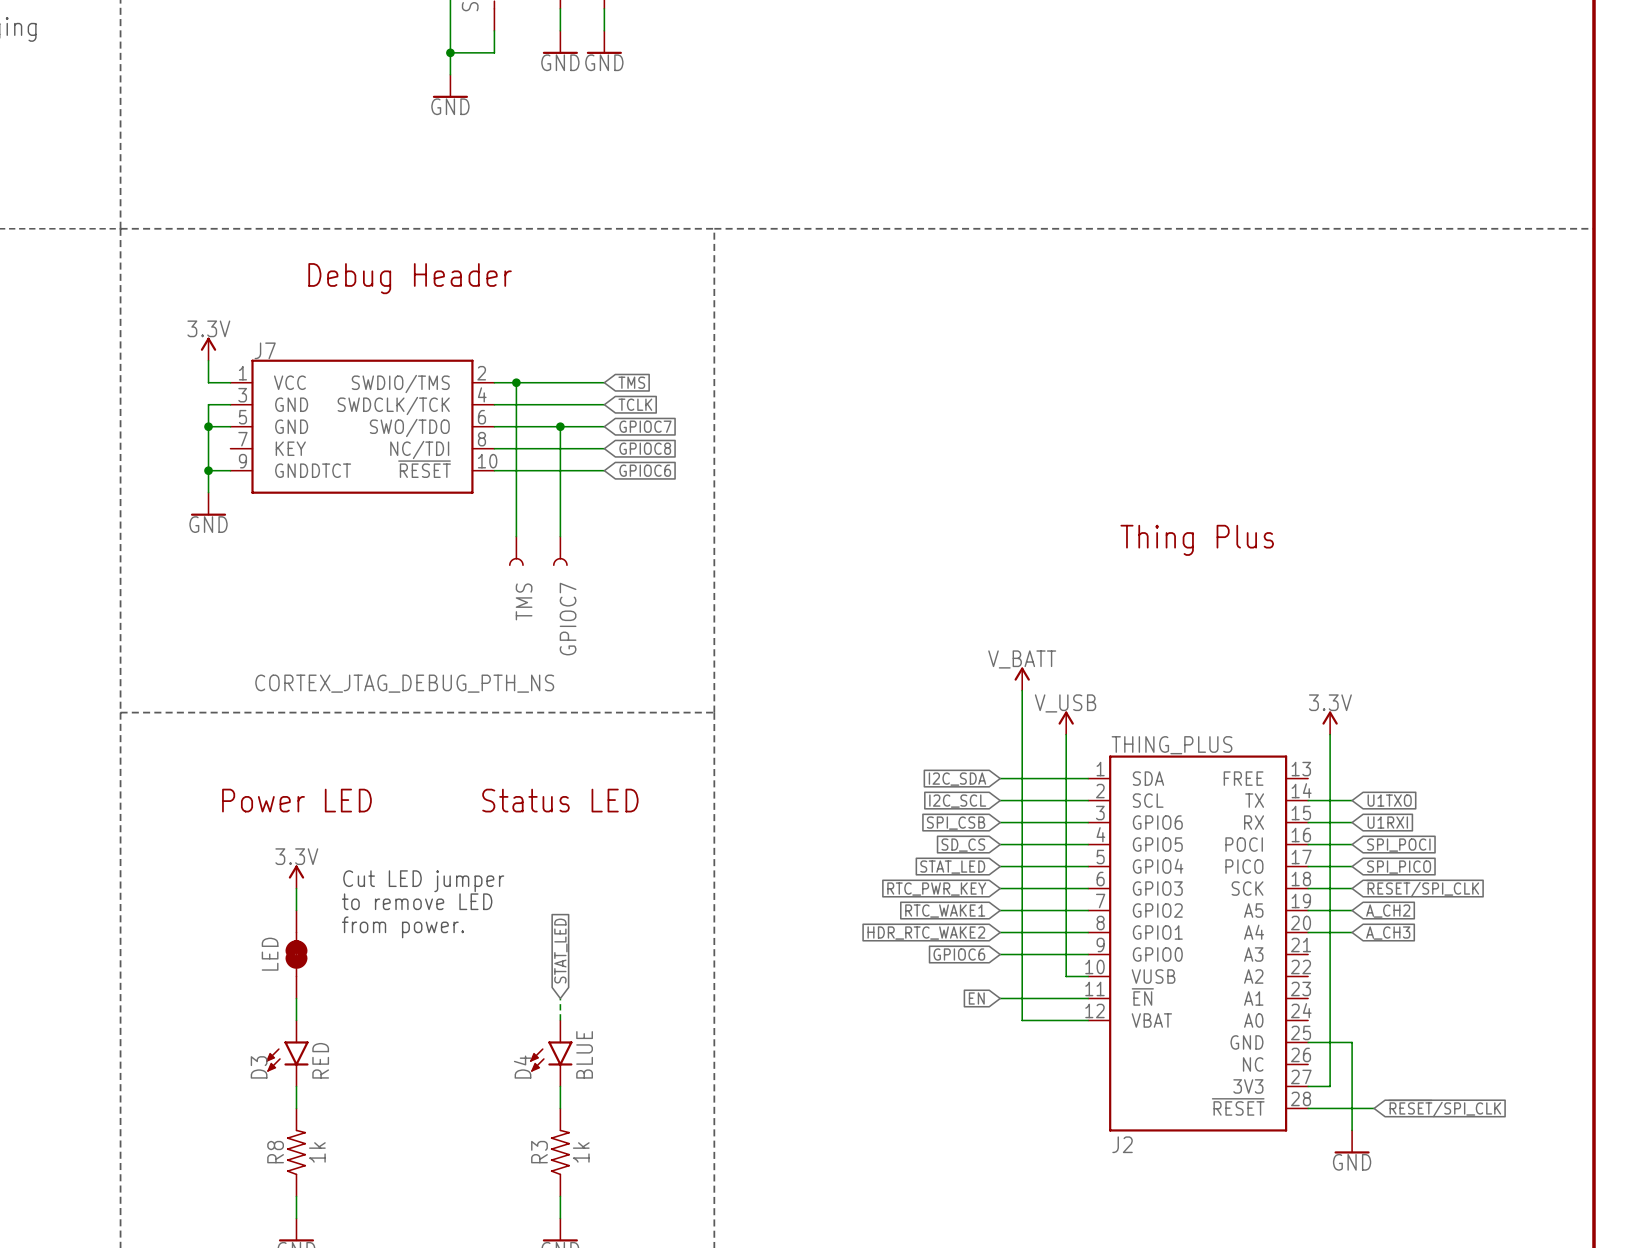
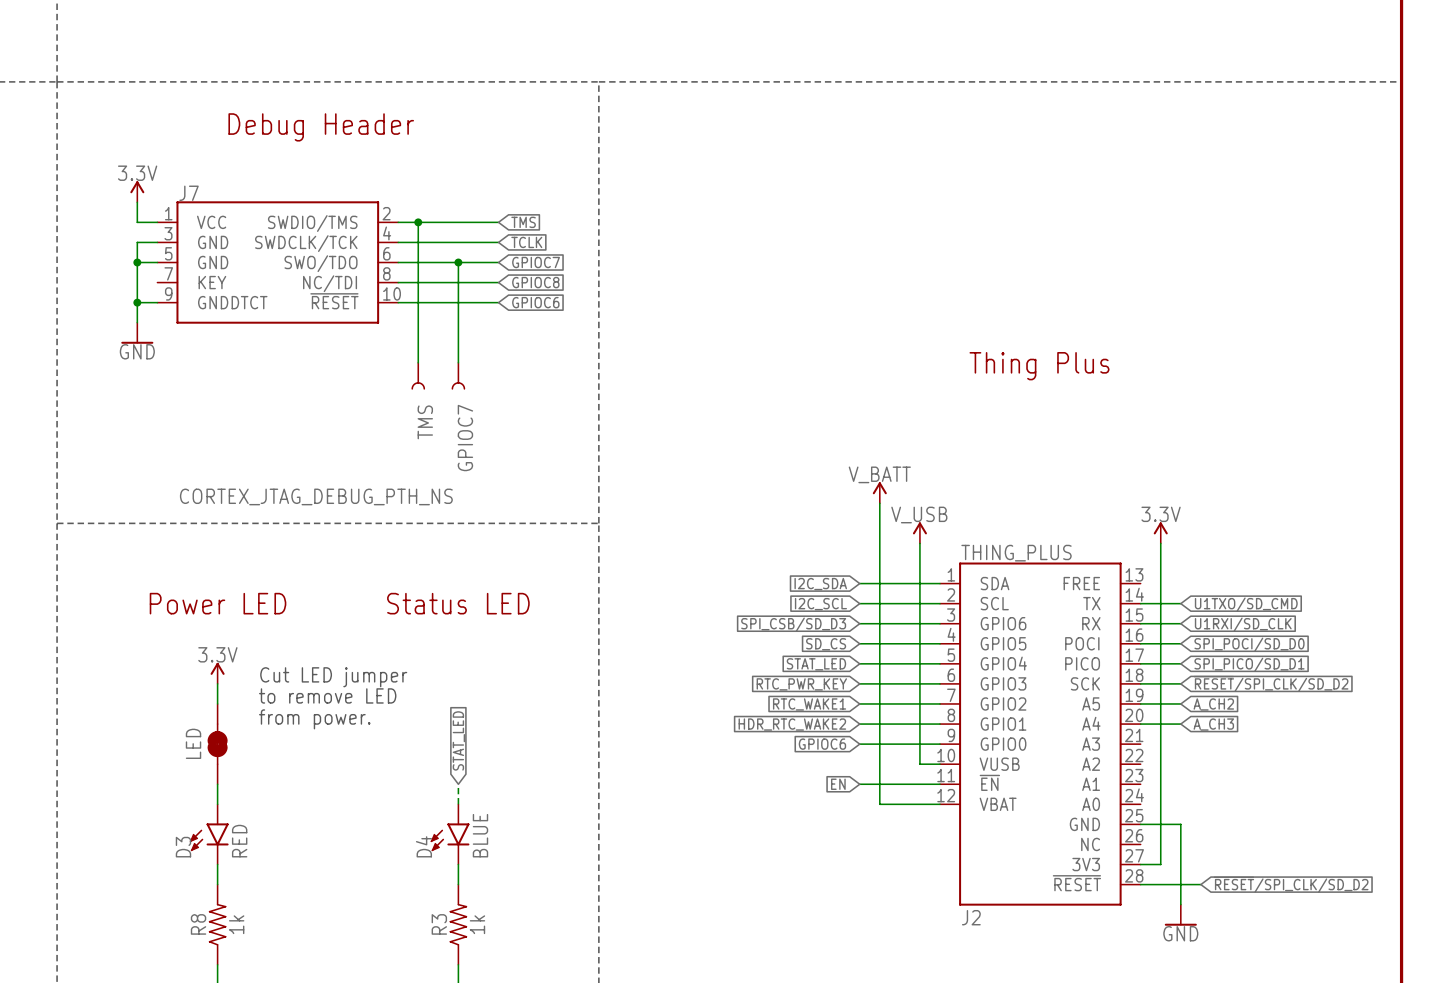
global label: U1TXO (1389, 800) -> U1TXO/SD_CMD (1246, 604)
global label: U1RXI (1387, 822) -> U1RXI/SD_CLK (1243, 624)
global label: SPI_CSB (956, 823) -> SPI_CSB/SD_D3 (793, 624)
global label: SPI_POCI (1398, 845) -> SPI_POCI/SD_D0 (1249, 644)
global label: SPI_PICO (1399, 867) -> SPI_PICO/SD_D1 (1249, 664)
global label: ~{RESET}/SPI_CLK (1422, 888) -> ~{RESET}/SPI_CLK/SD_D2 (1271, 683)
global label: ~{RESET}/SPI_CLK (1444, 1108) -> ~{RESET}/SPI_CLK/SD_D2 (1291, 884)

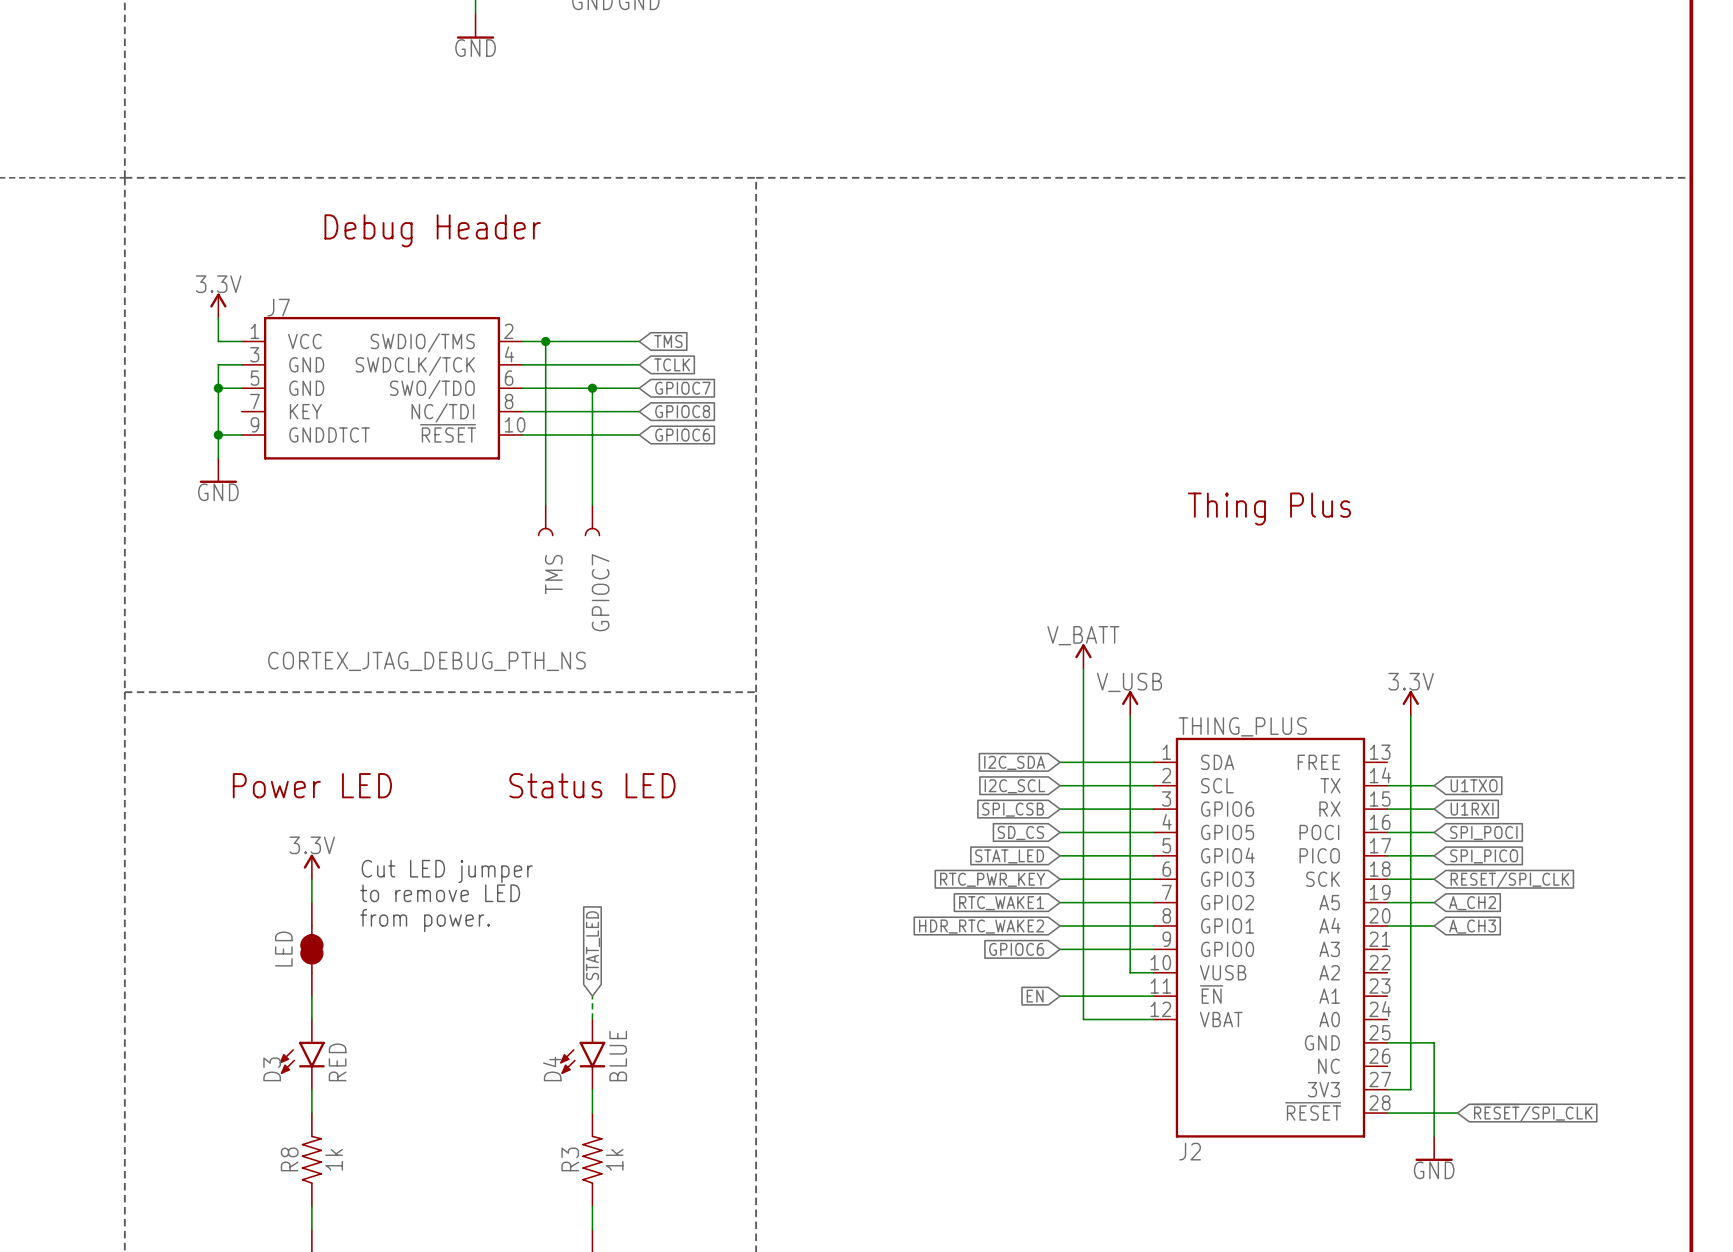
global label: U1TXO/SD_CMD (1246, 604) -> U1TXO (1474, 785)
global label: SPI_CSB/SD_D3 (793, 624) -> SPI_CSB (1013, 809)
global label: U1RXI/SD_CLK (1243, 624) -> U1RXI (1472, 809)
global label: SPI_POCI/SD_D0 (1249, 644) -> SPI_POCI (1483, 833)
global label: SPI_PICO/SD_D1 (1249, 664) -> SPI_PICO (1484, 856)
global label: ~{RESET}/SPI_CLK/SD_D2 (1271, 683) -> ~{RESET}/SPI_CLK (1509, 879)
global label: ~{RESET}/SPI_CLK/SD_D2 (1291, 884) -> ~{RESET}/SPI_CLK (1532, 1113)

